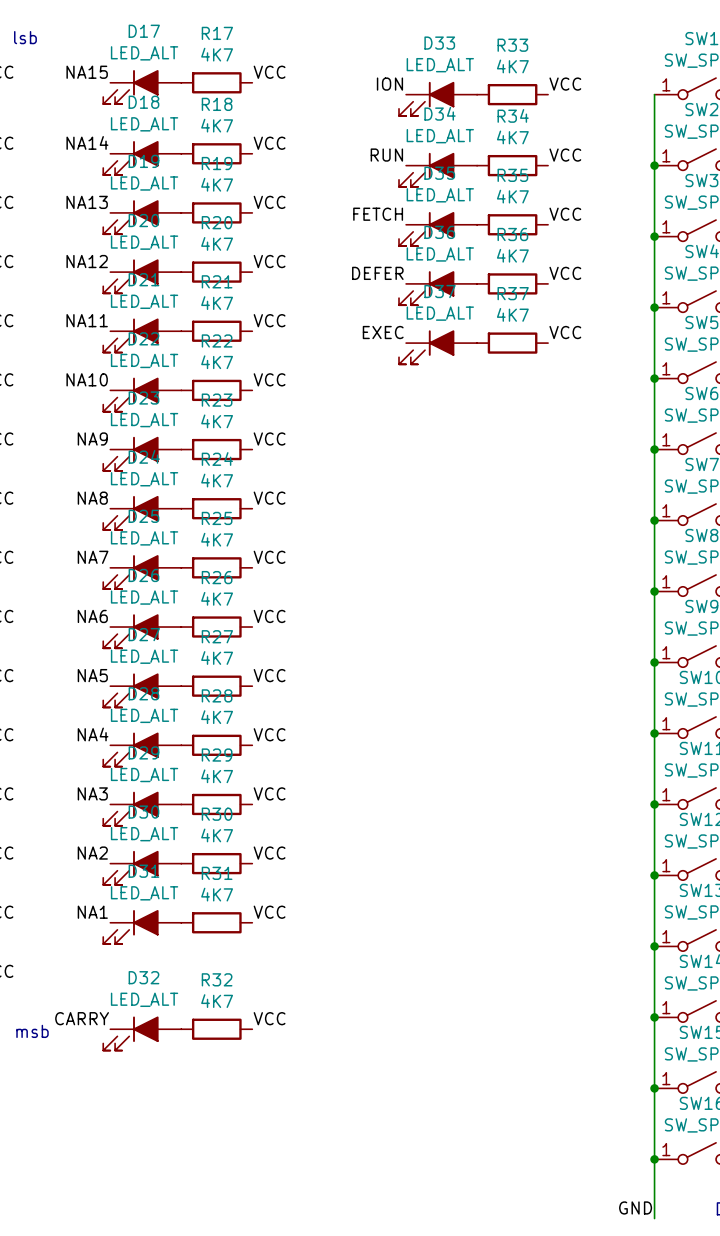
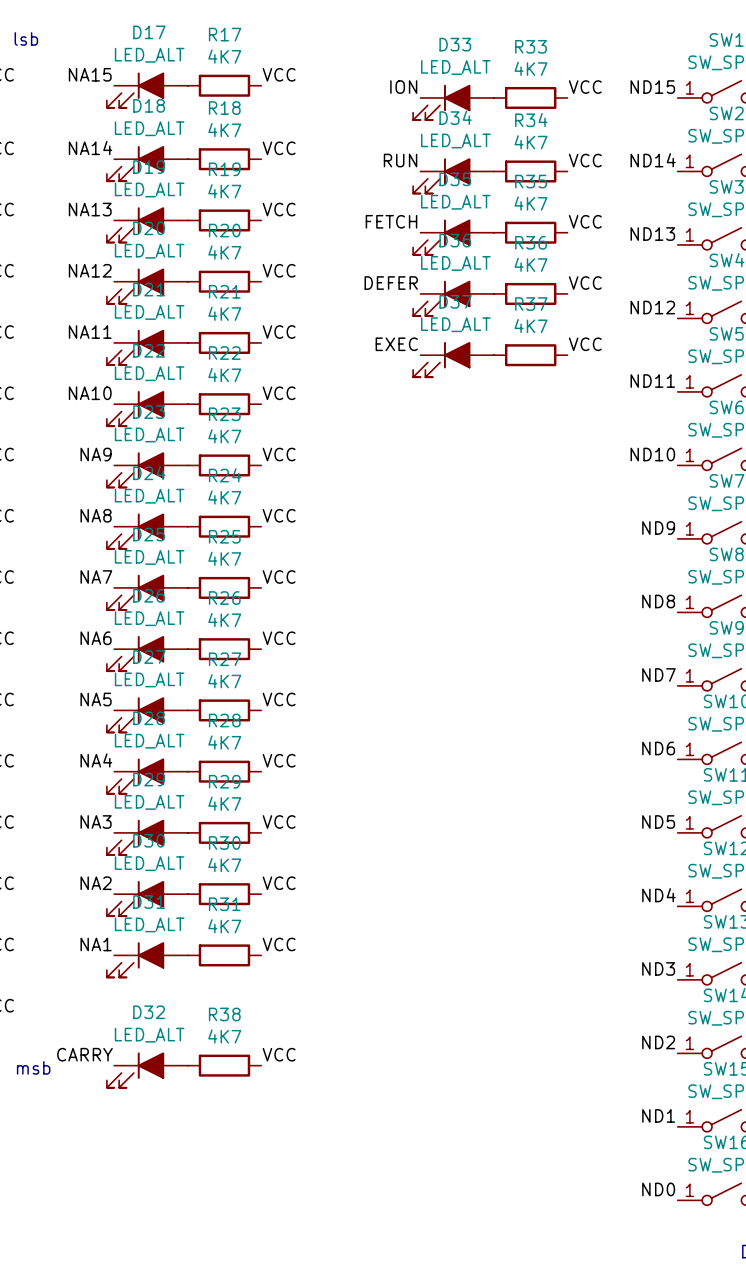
label: none -> ND15 (652, 87)
wire: (654, 94) (654, 1218) -> none
label: none -> ND14 (653, 160)
junction: (654, 165) -> none
label: none -> ND13 (652, 234)
junction: (654, 236) -> none
label: none -> ND12 (652, 307)
junction: (654, 307) -> none
label: none -> ND11 (652, 381)
junction: (654, 378) -> none
label: none -> ND10 (652, 454)
junction: (654, 449) -> none
label: none -> ND9 (658, 528)
junction: (654, 520) -> none
label: none -> ND8 (658, 601)
junction: (654, 591) -> none
label: none -> ND7 (658, 675)
junction: (654, 662) -> none
label: none -> ND6 (658, 748)
junction: (654, 733) -> none
label: none -> ND5 (658, 821)
junction: (654, 804) -> none
label: none -> ND4 (658, 895)
junction: (654, 875) -> none
label: none -> ND3 (658, 968)
junction: (654, 946) -> none
R32 name: R32 (217, 979) -> R38 (224, 1014)
label: none -> ND2 (658, 1042)
junction: (654, 1017) -> none
label: none -> ND1 (658, 1115)
junction: (654, 1088) -> none
label: none -> ND0 (658, 1189)
junction: (654, 1159) -> none
label: GND (635, 1207) -> none

